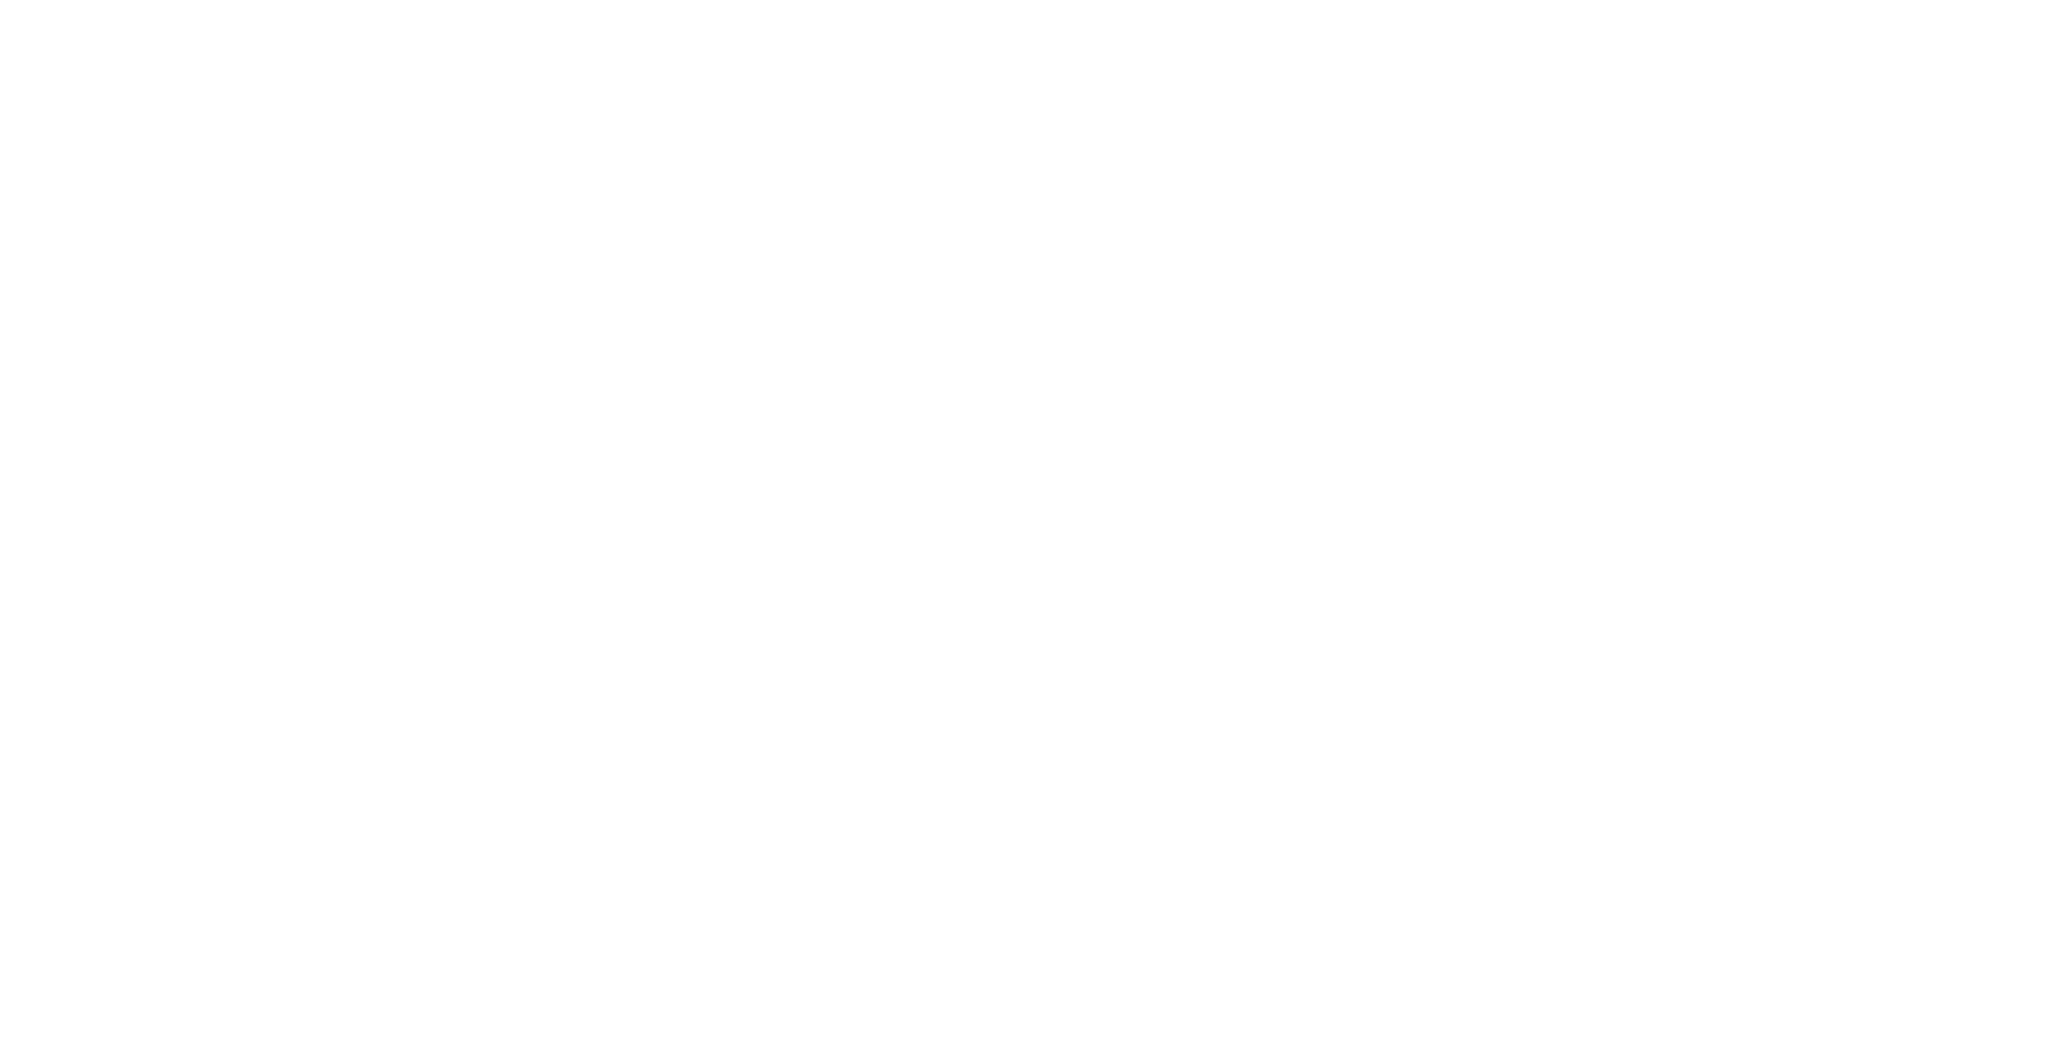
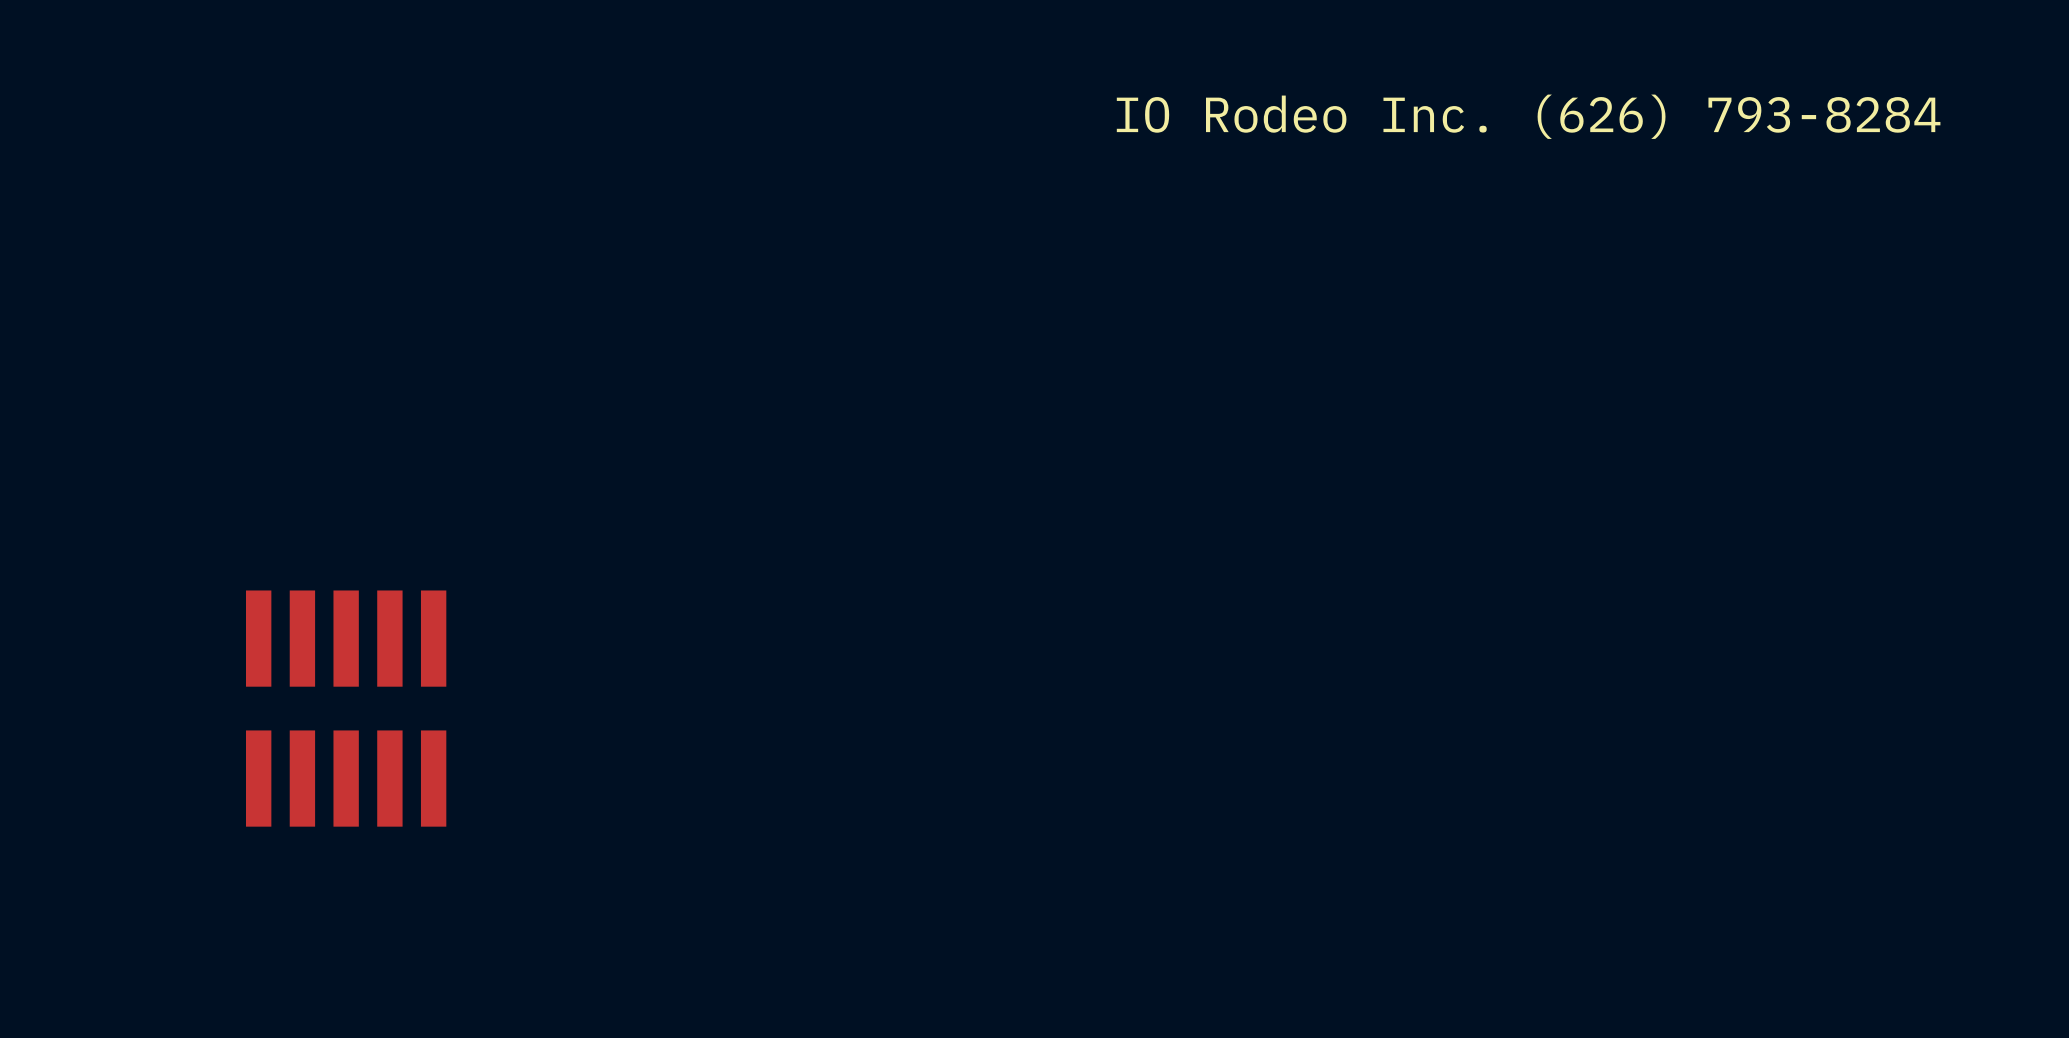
text: none -> IO Rodeo Inc. (626) 793-8284 (1528, 116)
part: none -> (346, 708)

